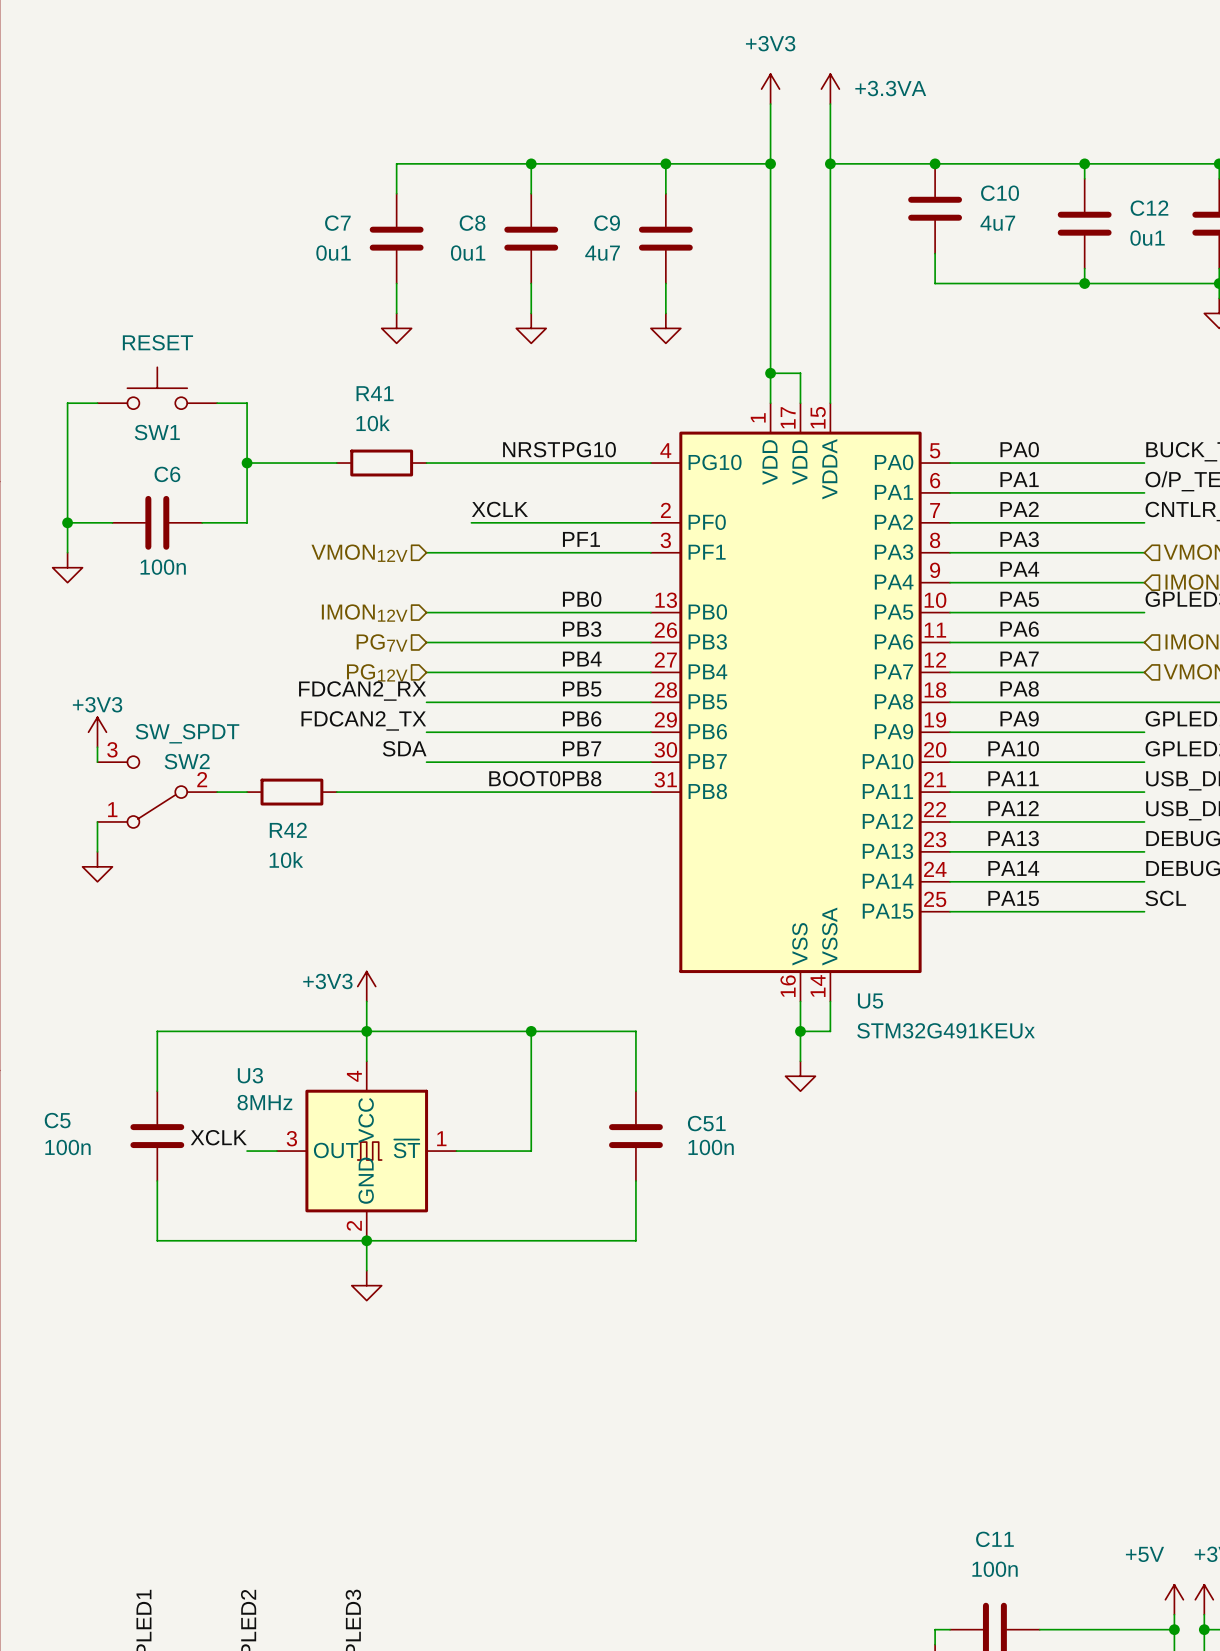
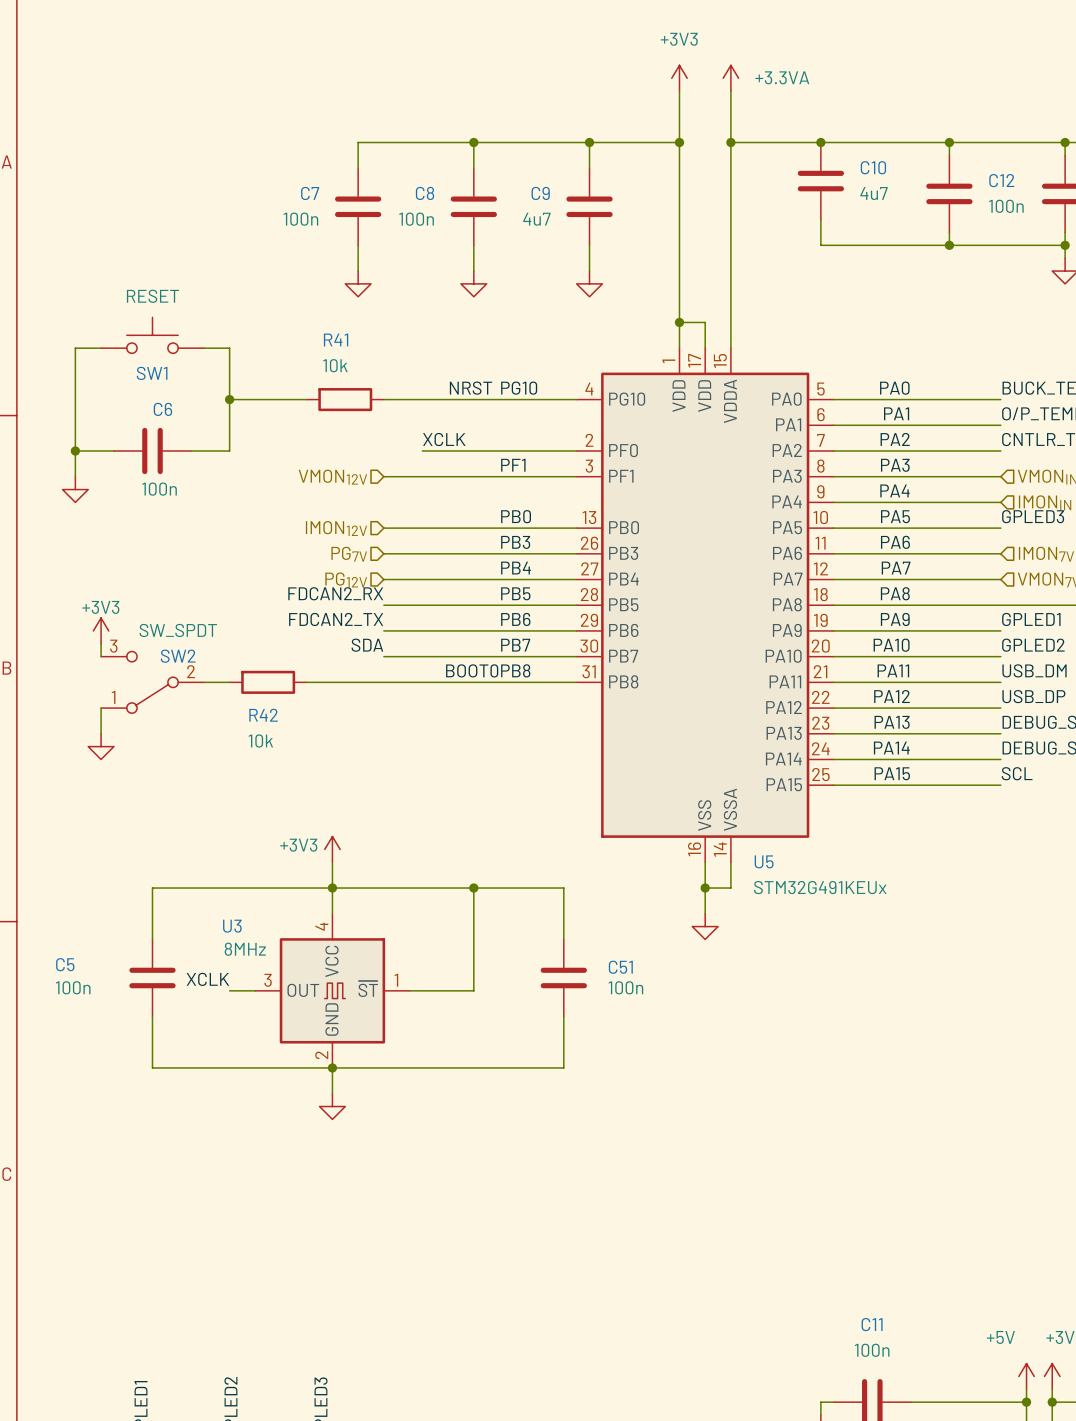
C12 value: 0u1 (1147, 238) -> 100n (1006, 206)
C7 value: 0u1 (333, 253) -> 100n (300, 219)
C8 value: 0u1 (468, 253) -> 100n (416, 219)

